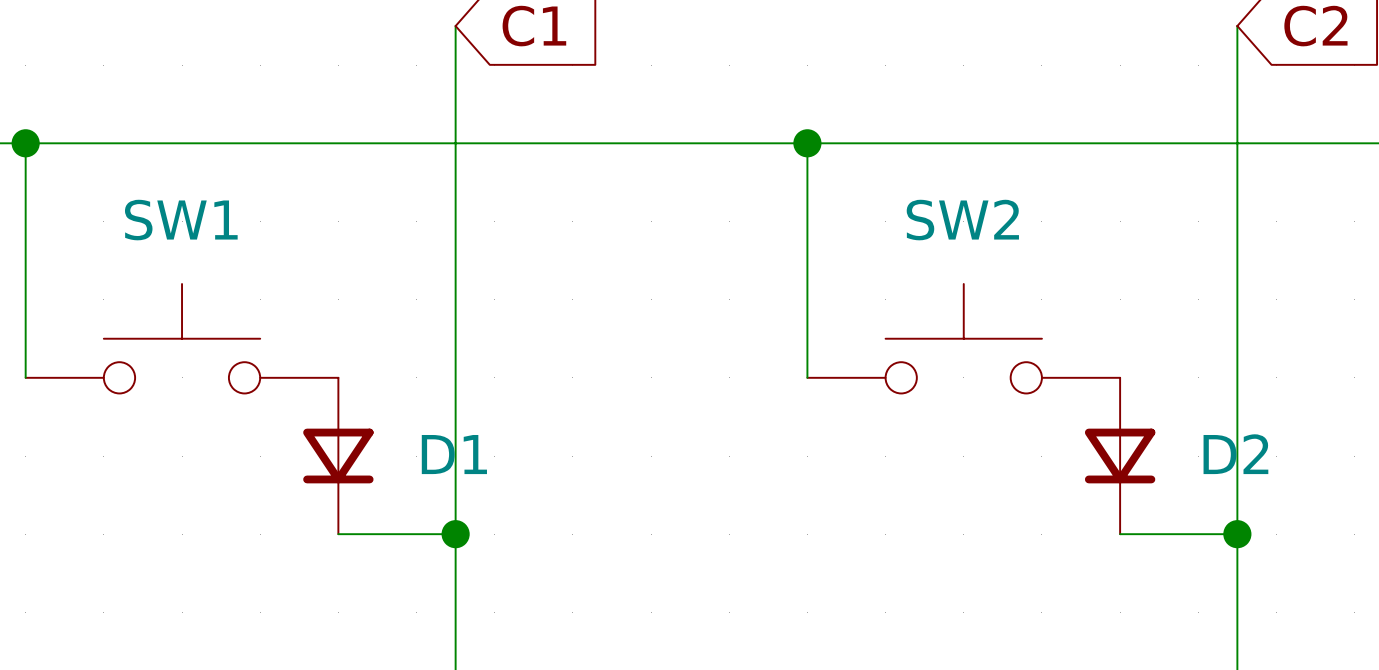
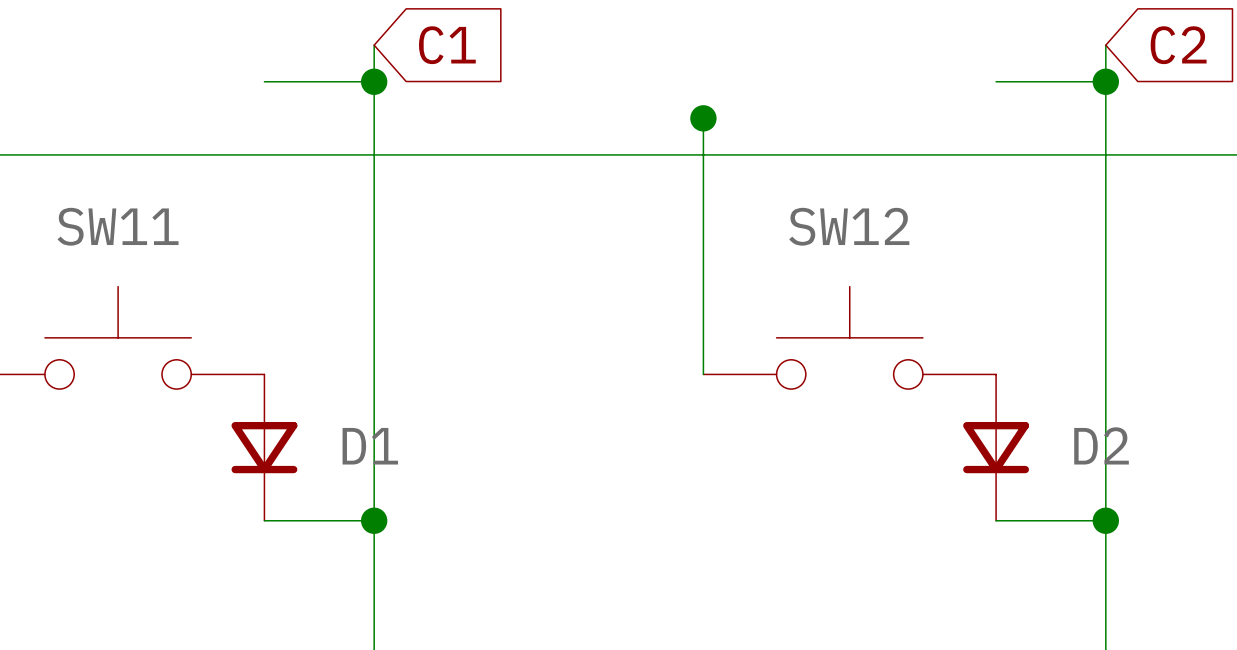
wire: none -> (264, 81) (374, 81)
junction: none -> (374, 81)
wire: none -> (996, 81) (1105, 81)
junction: none -> (1105, 81)
wire: none -> (703, 118) (703, 154)
junction position: (807, 143) -> (703, 118)
SW1 name: SW1 (181, 220) -> SW11 (118, 226)
SW2 name: SW2 (962, 220) -> SW12 (849, 226)

